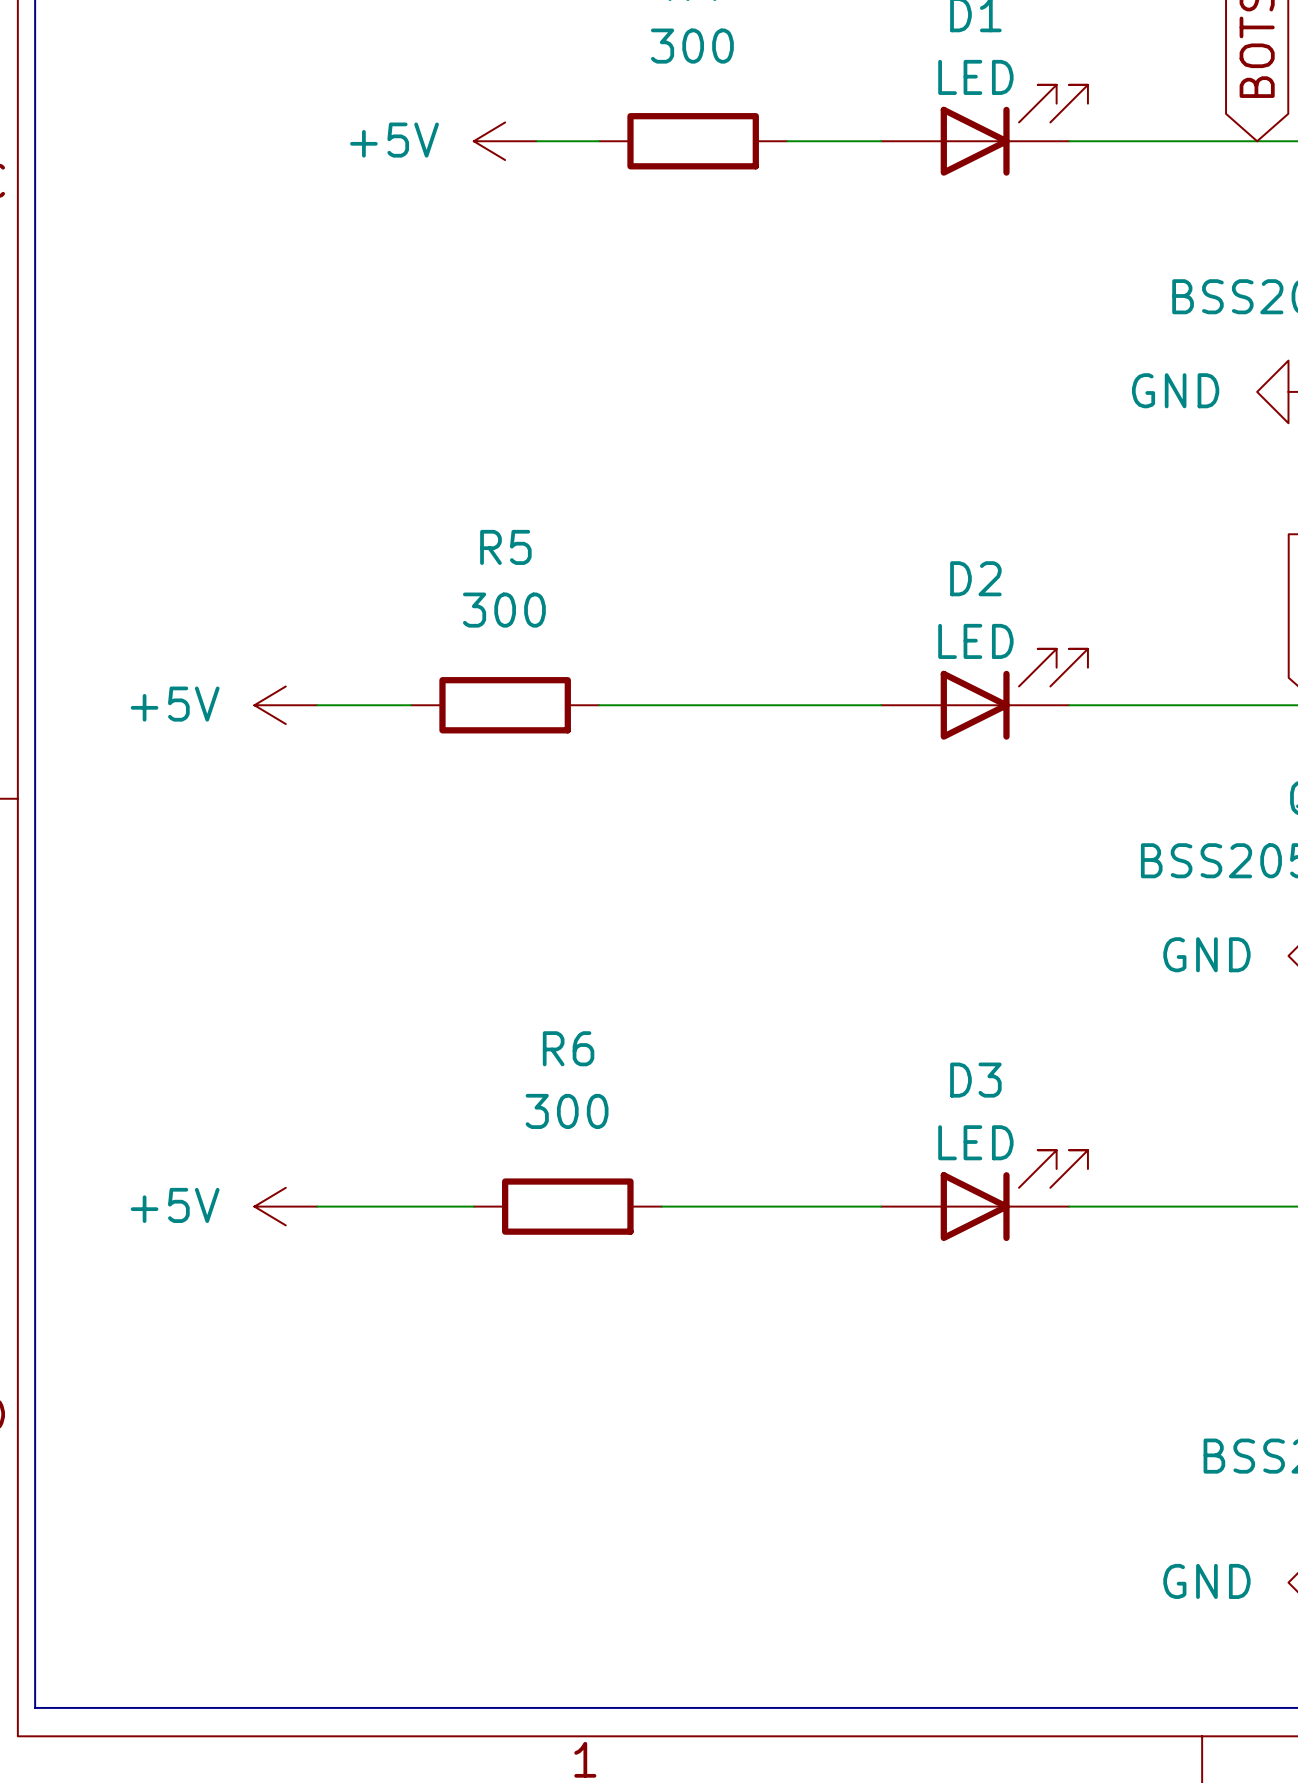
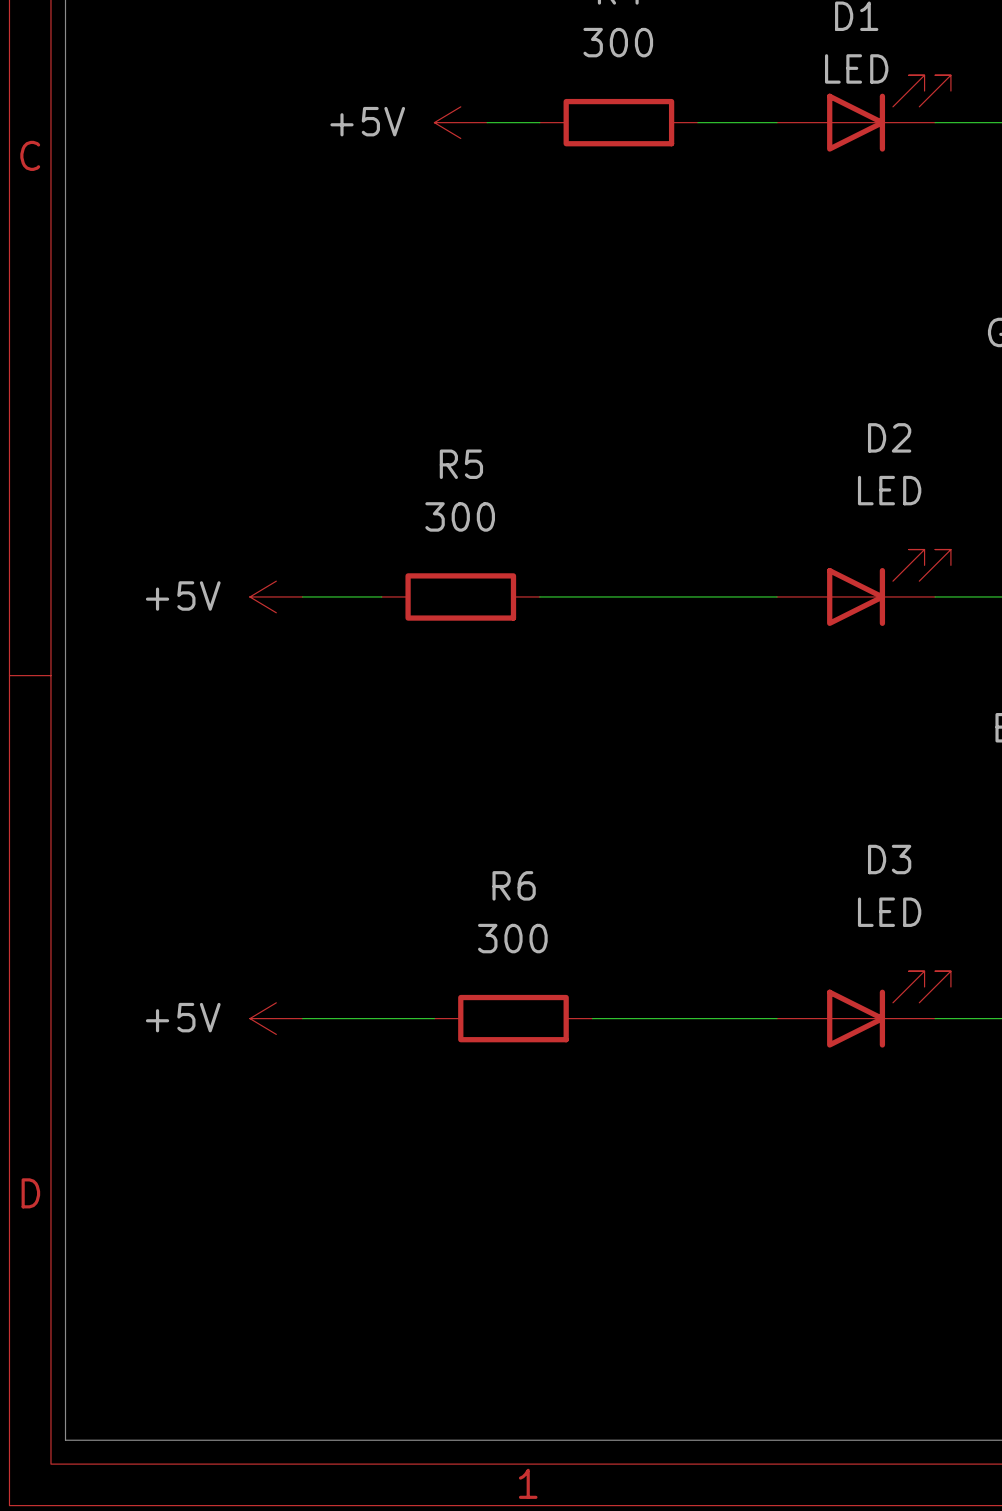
D2 name position: D2 (975, 578) -> D2 (889, 437)
D2 value position: LED (975, 641) -> LED (889, 490)
D3 name position: D3 (975, 1080) -> D3 (889, 859)
D3 value position: LED (975, 1142) -> LED (889, 912)

